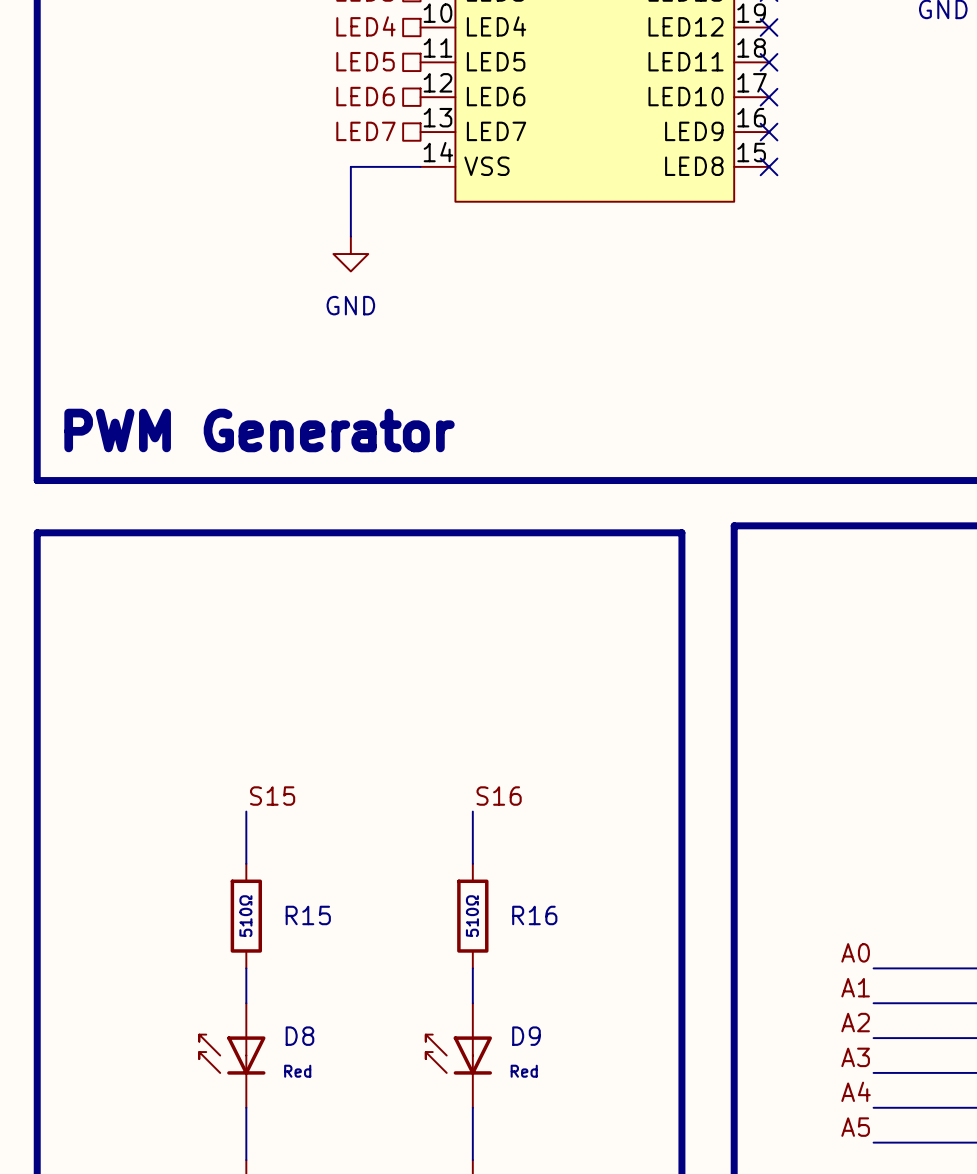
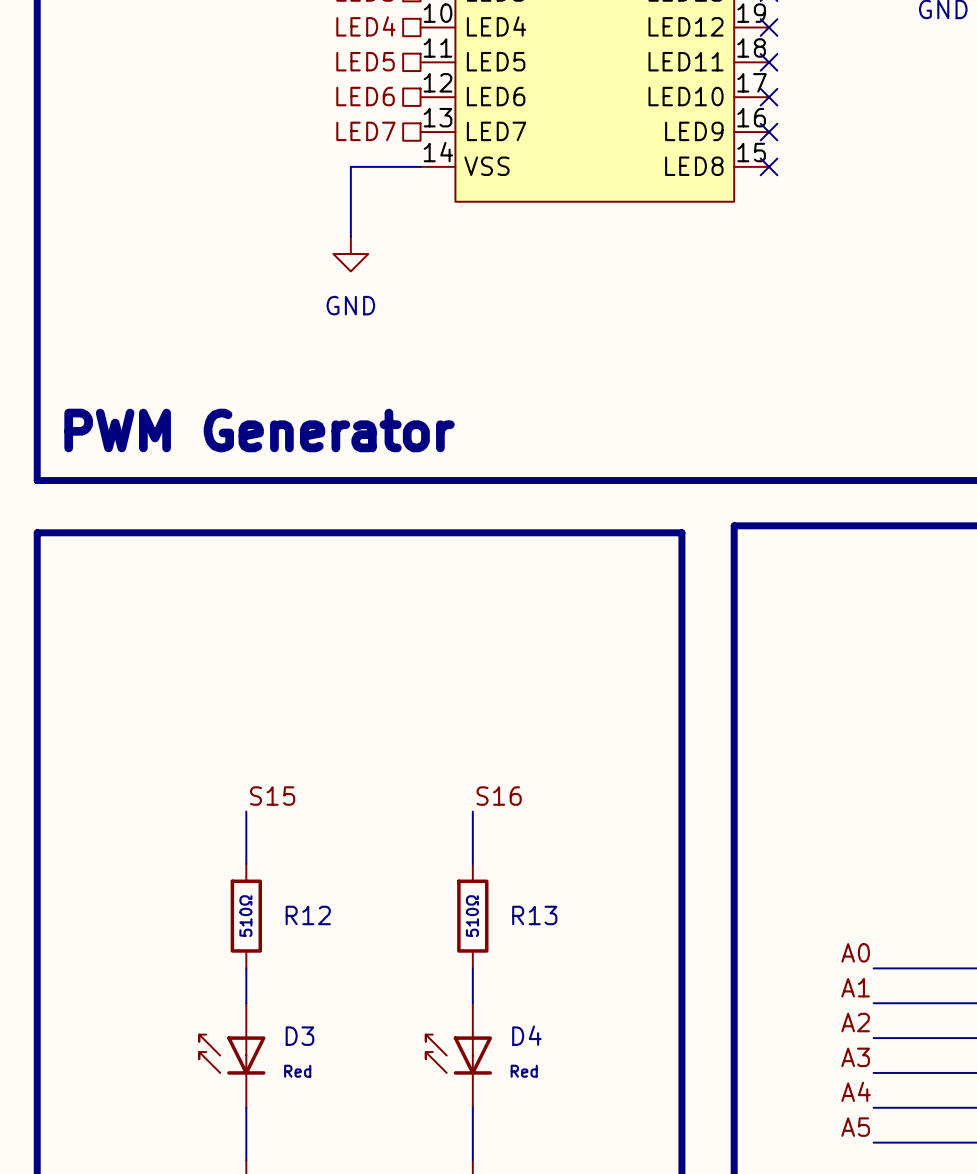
R15 name: R15 (308, 915) -> R12 (308, 915)
R16 name: R16 (534, 915) -> R13 (534, 915)
D8 name: D8 (299, 1036) -> D3 (299, 1036)
D9 name: D9 (526, 1036) -> D4 (526, 1035)

